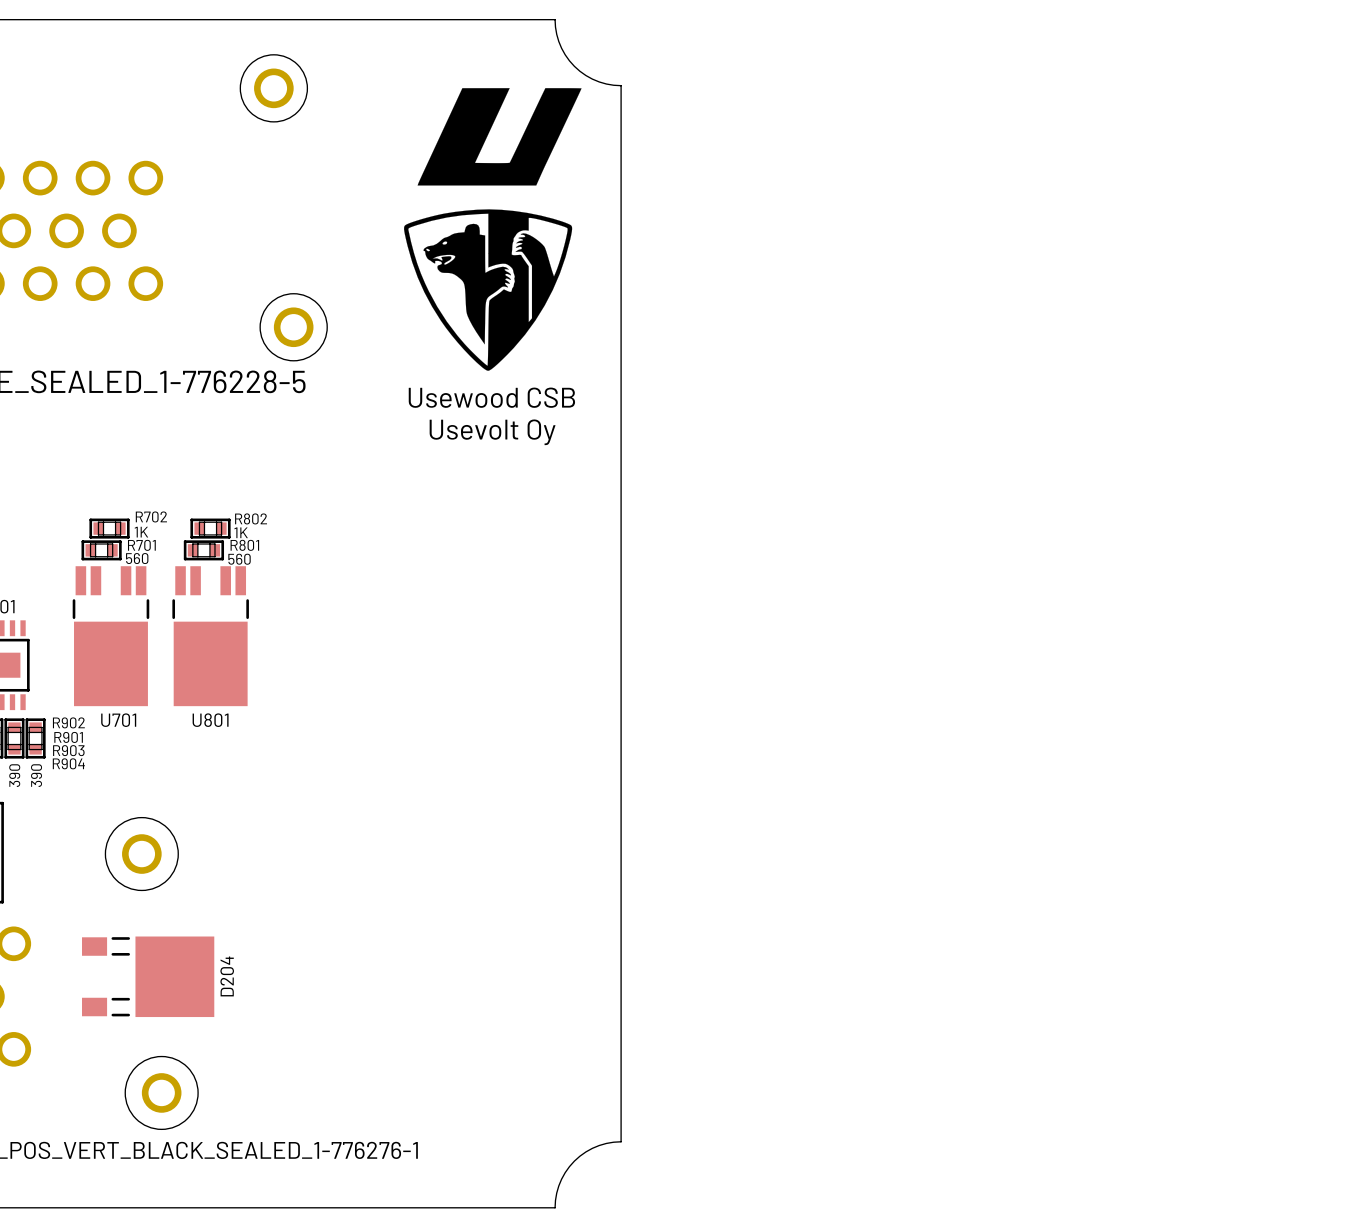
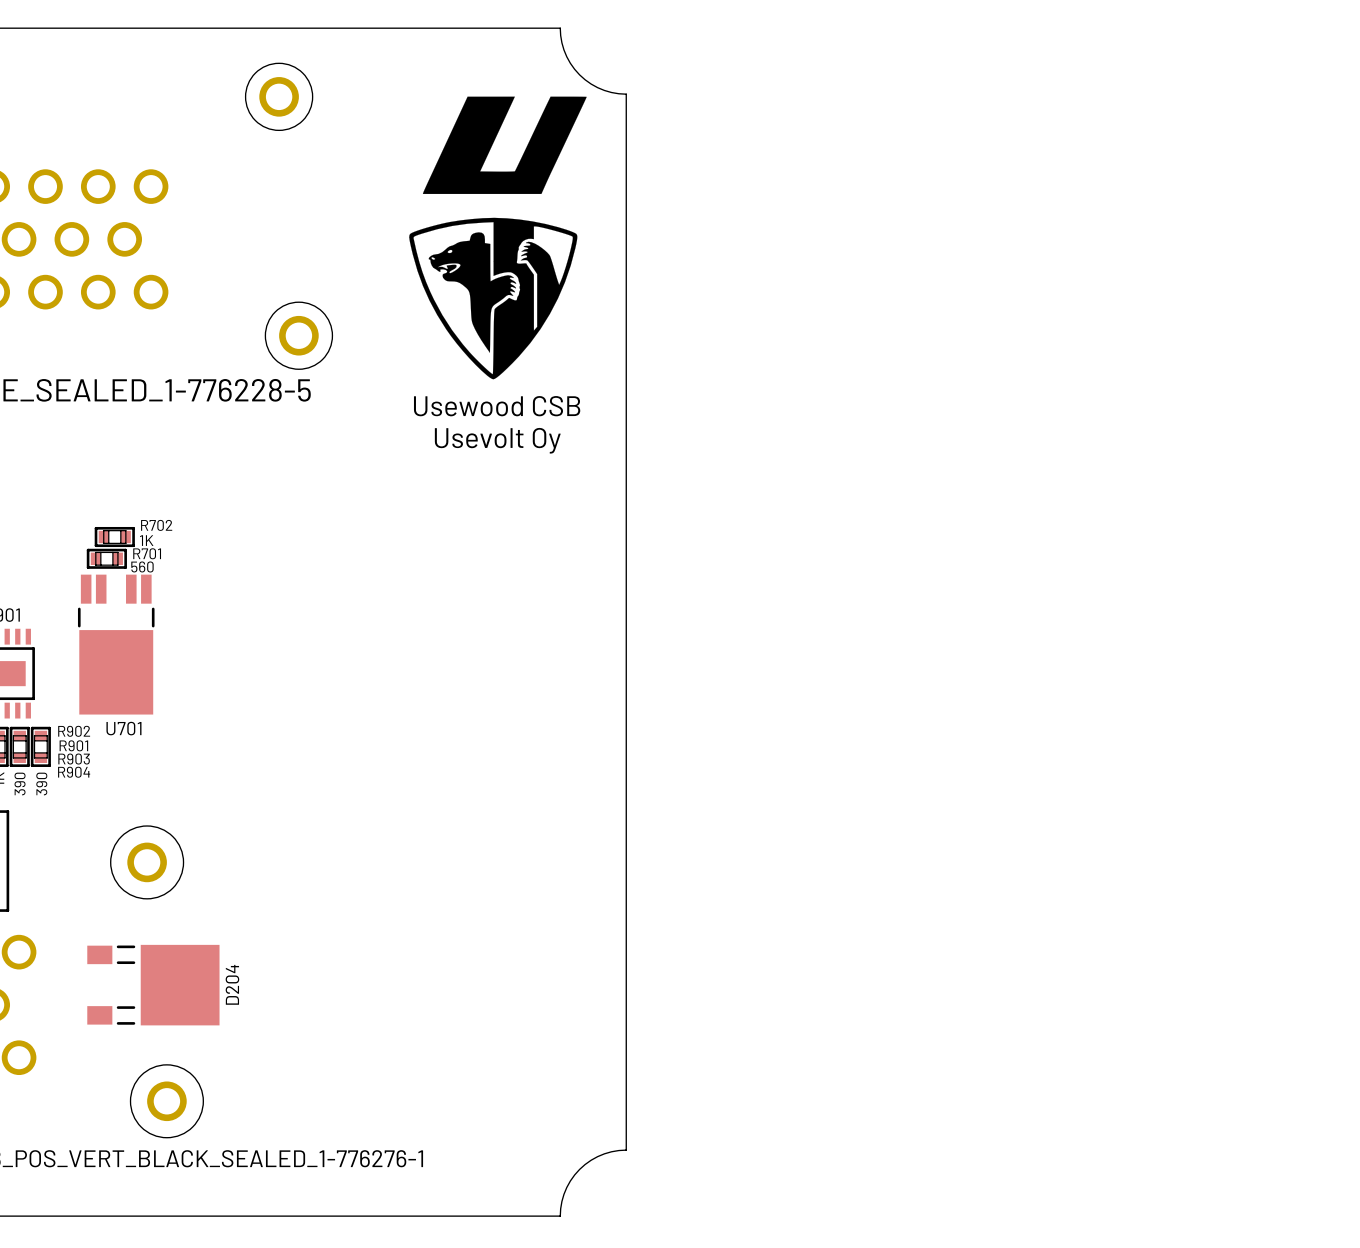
R802: 1K (210, 528) -> none
R801: 560 (203, 550) -> none
U801: (210, 636) -> none

